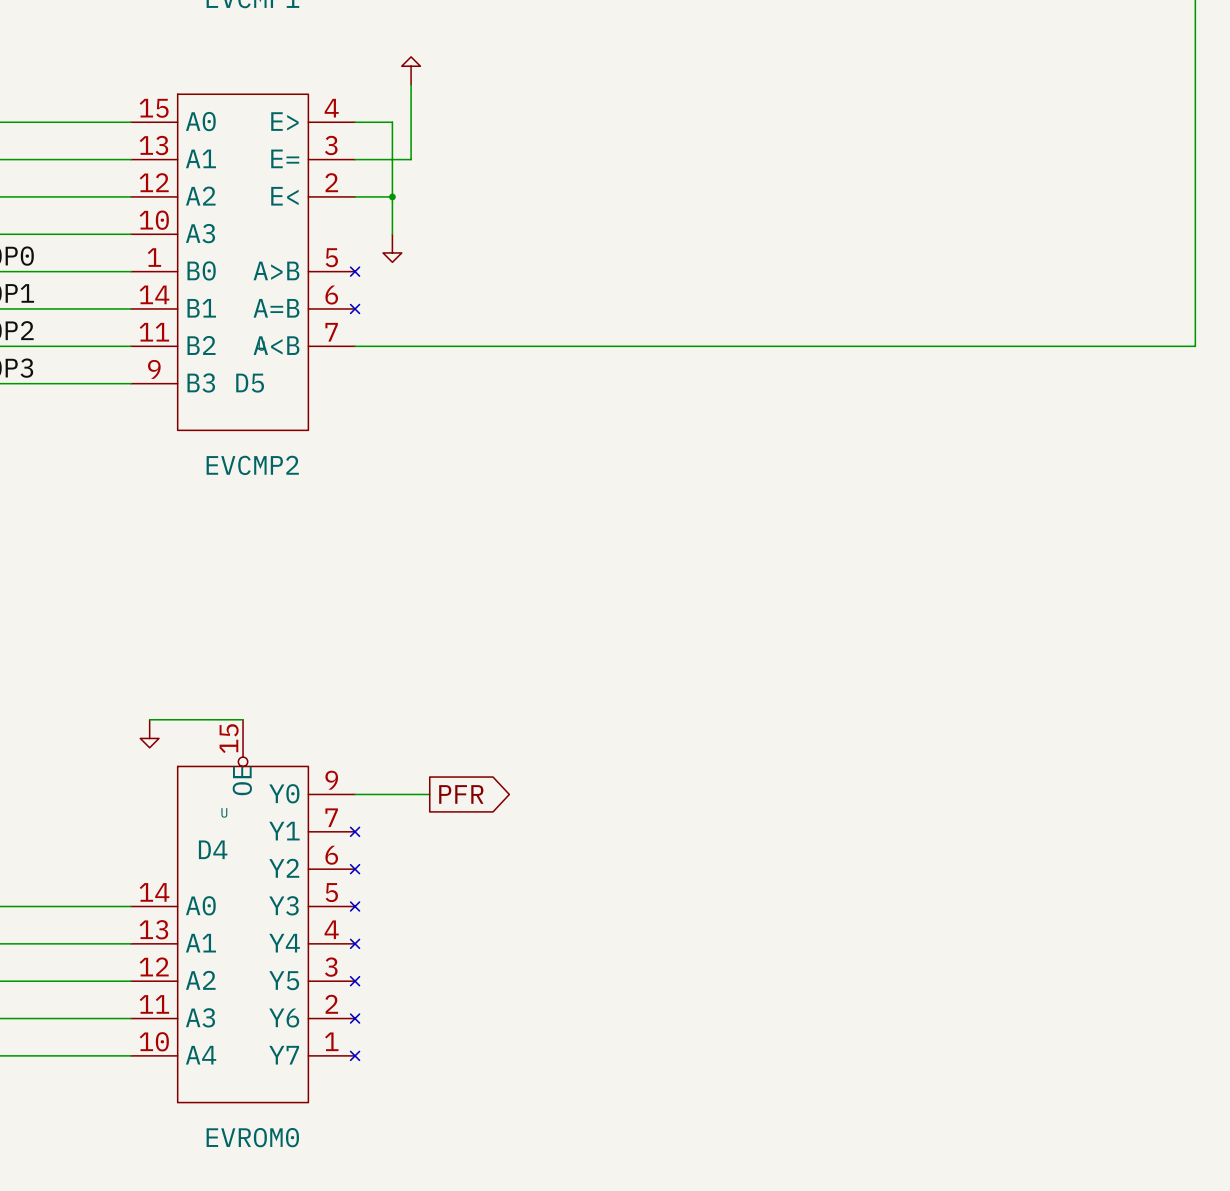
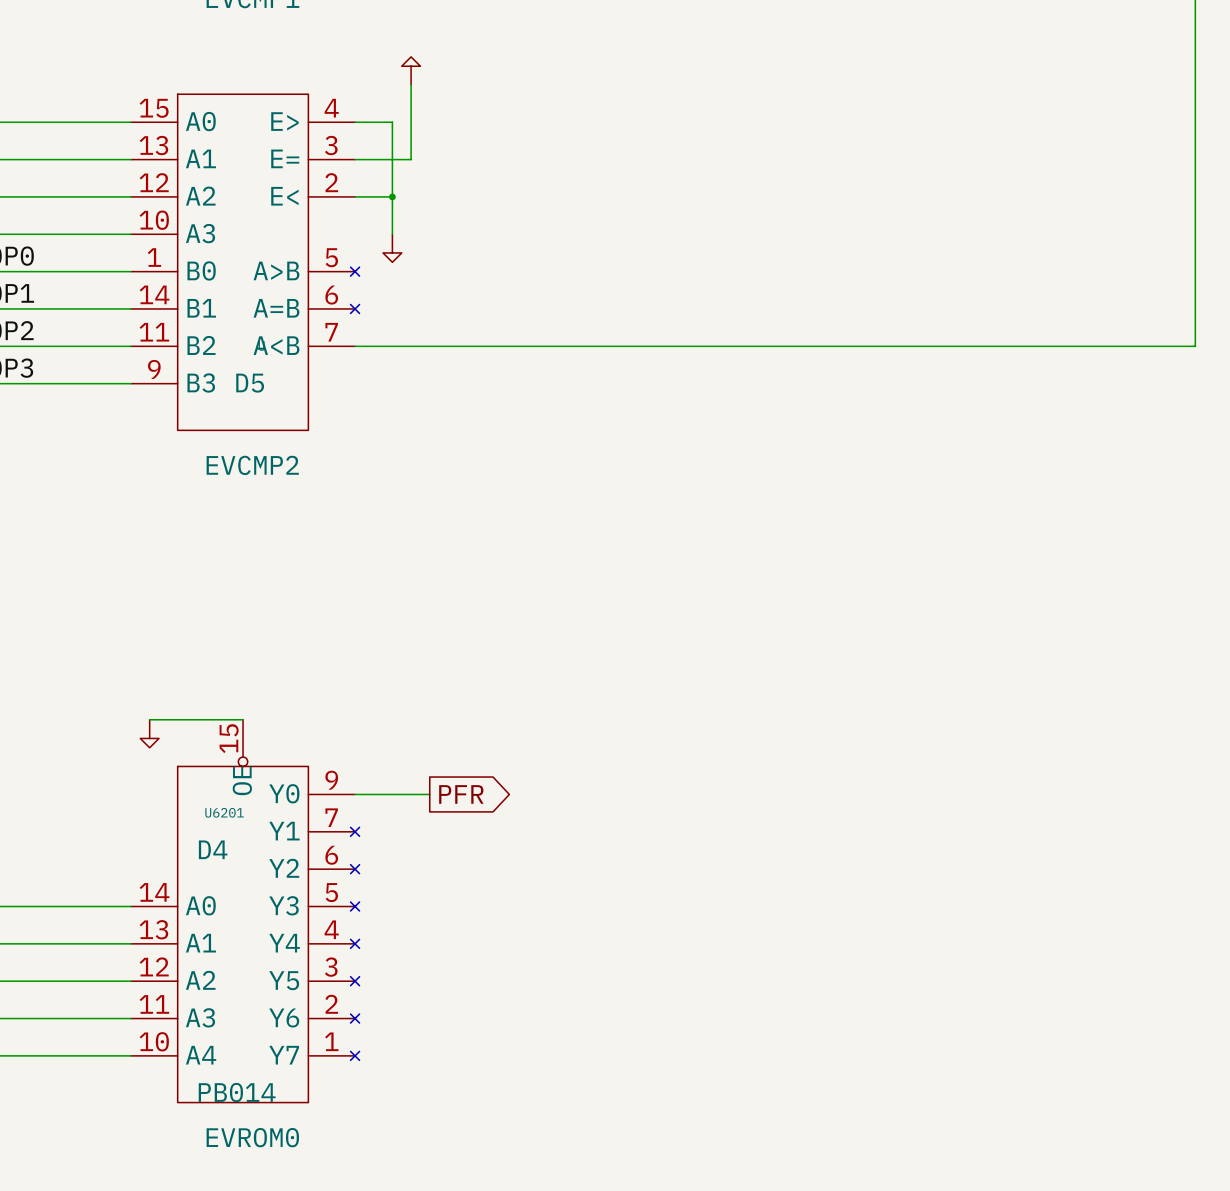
U name: U (224, 812) -> U6201 (224, 812)
U value: none -> PB014 (237, 1092)

